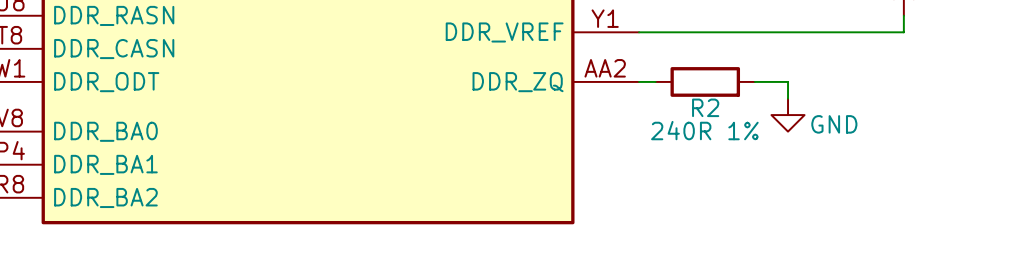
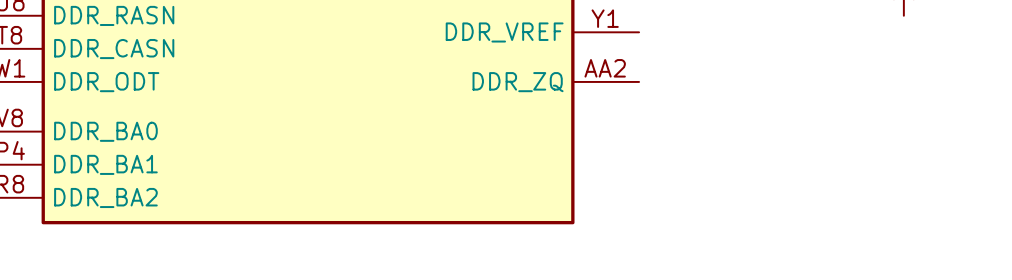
wire: (903, 15) (903, 32) (639, 32) -> none
wire: (639, 81) (655, 81) -> none
R2: 240R 1% (705, 81) -> none
wire: (754, 81) (788, 81) (788, 98) -> none
power symbol: GND (788, 115) -> none

